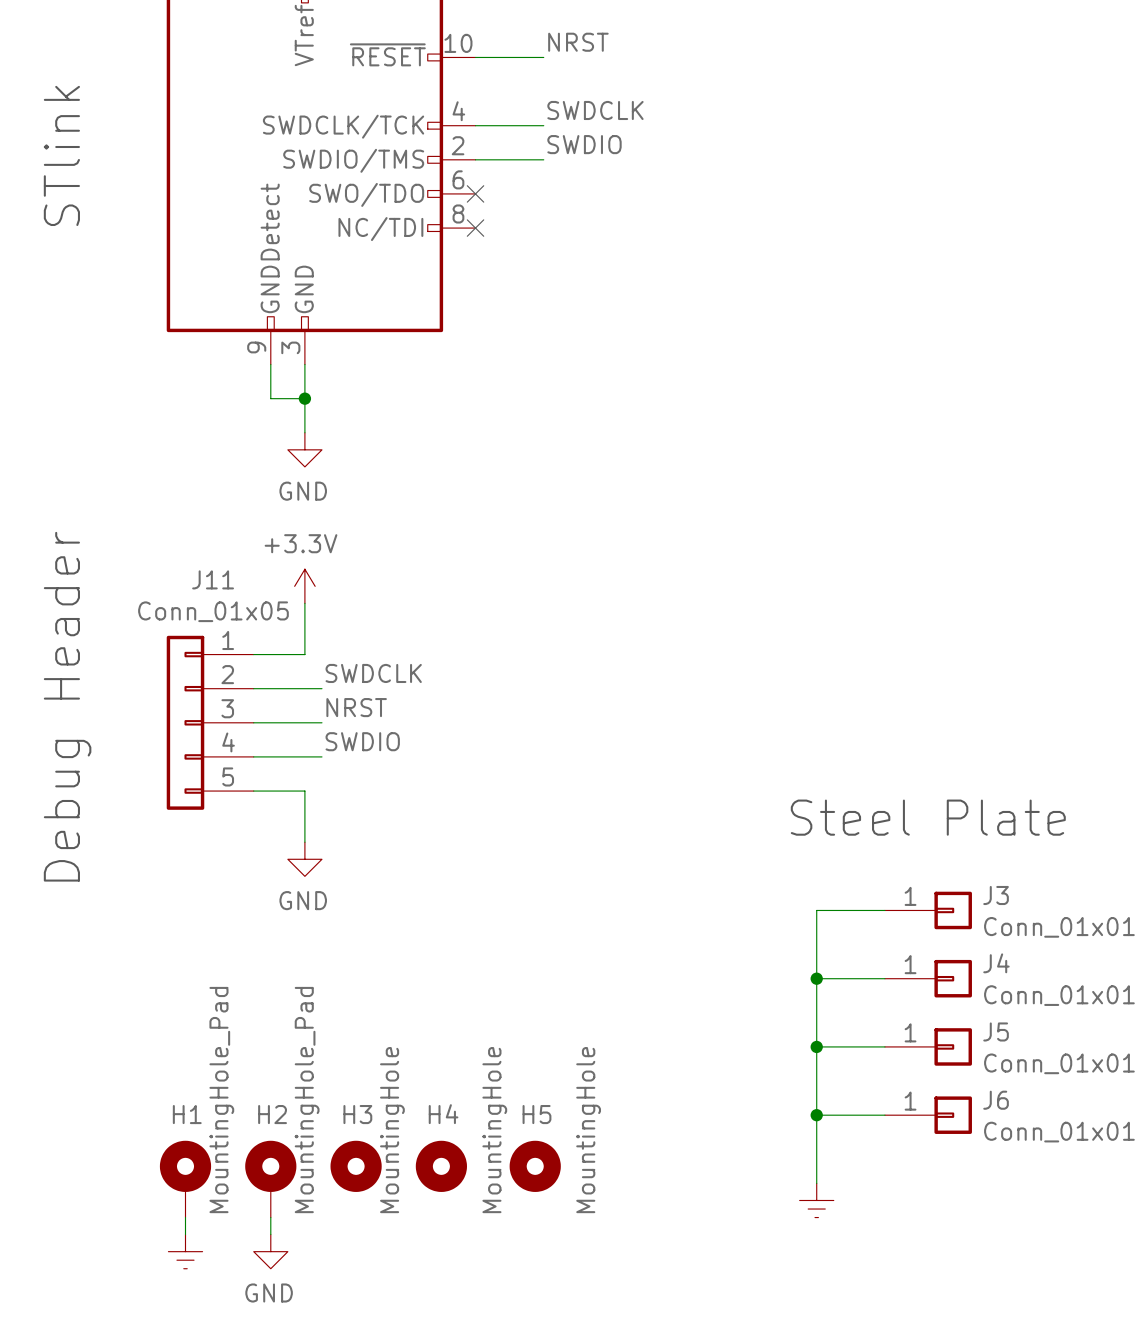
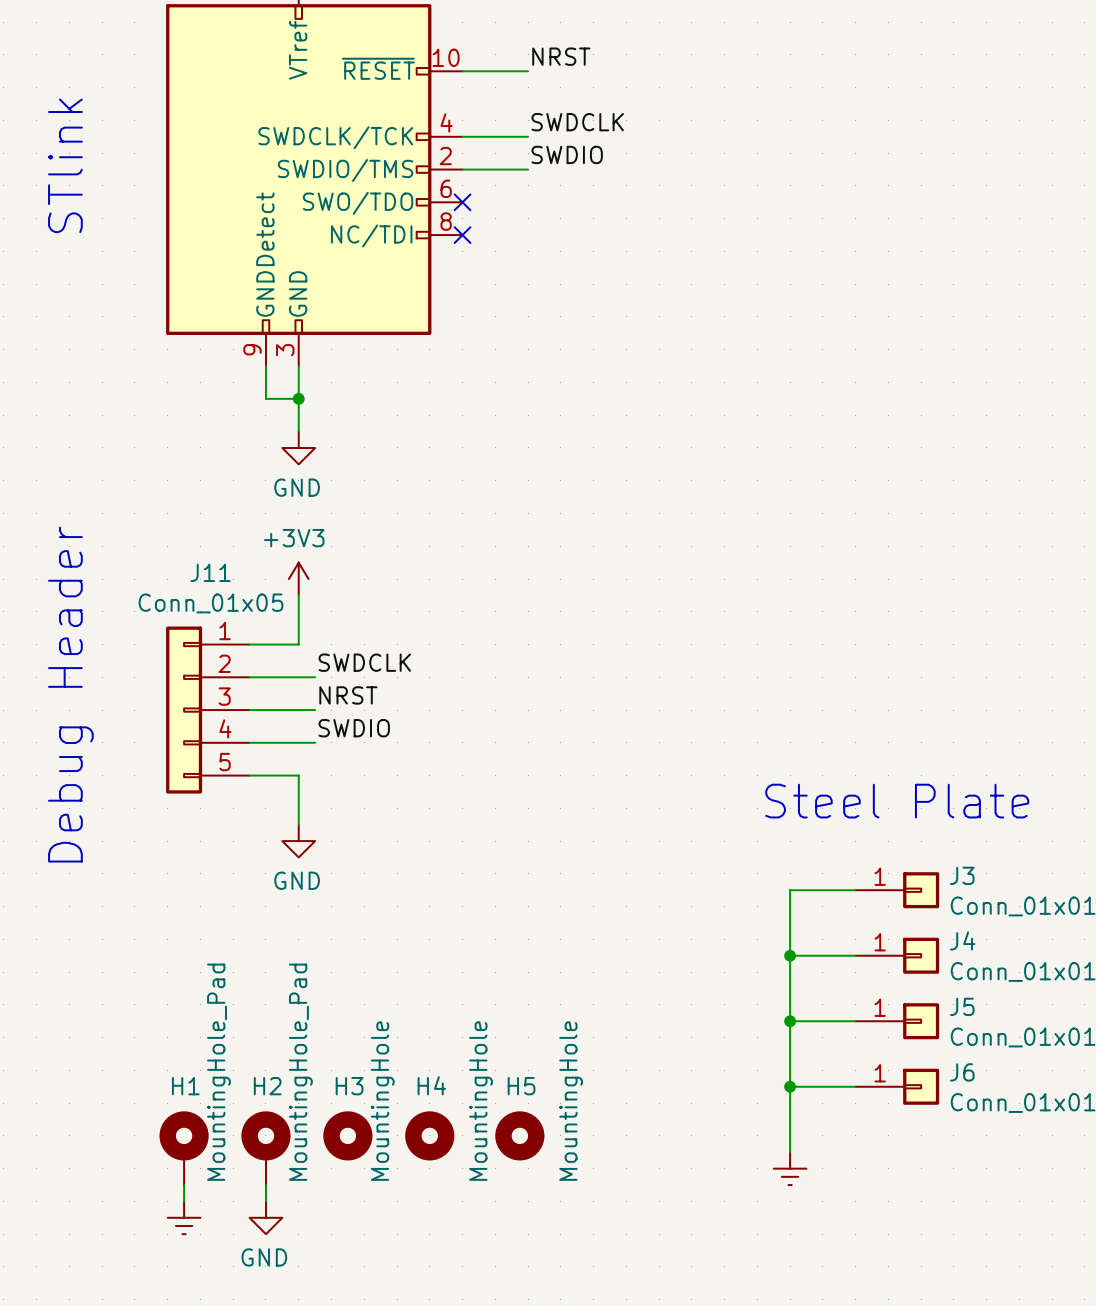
power symbol: +3.3V (304, 586) -> +3V3 (298, 579)

